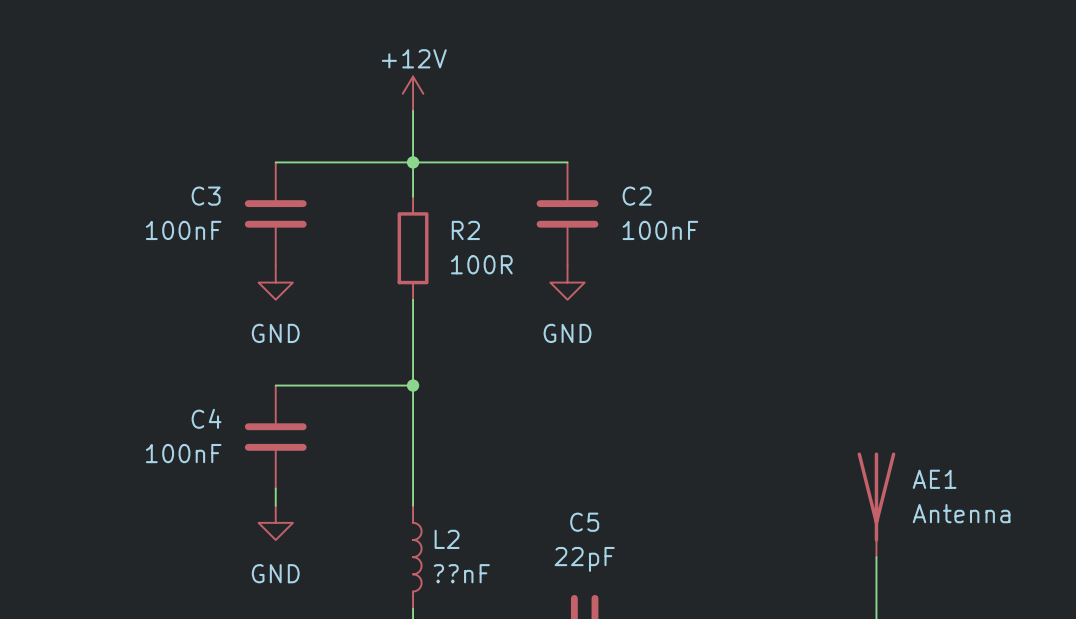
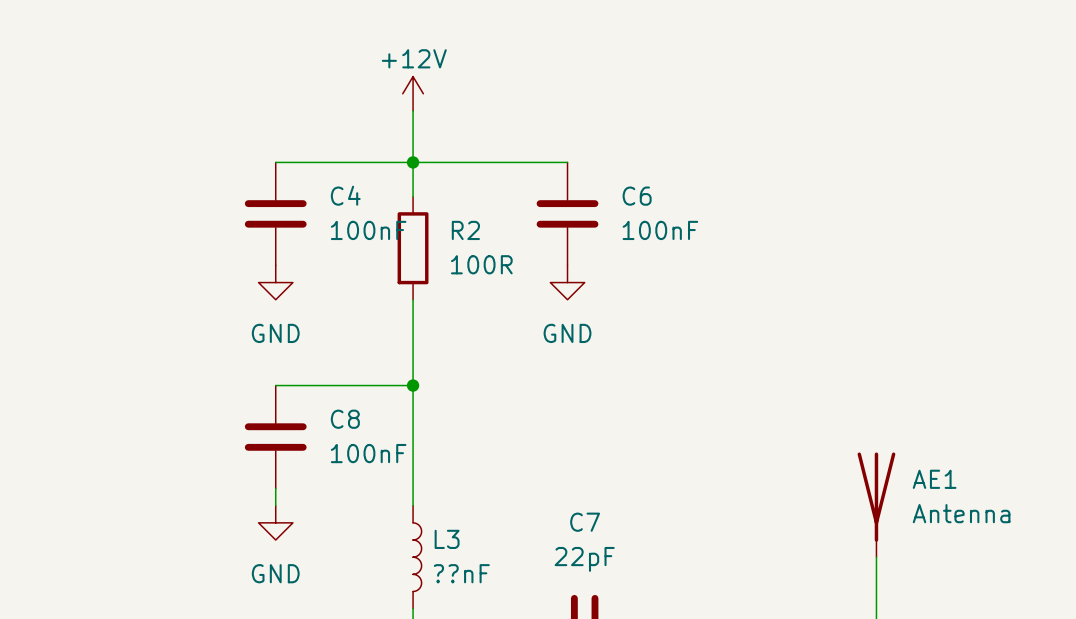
C3 name: C3 (206, 196) -> C4 (345, 195)
C2 name: C2 (637, 196) -> C6 (637, 196)
C3 value position: 100nF (183, 230) -> 100nF (368, 230)
C4 name: C4 (206, 418) -> C8 (345, 419)
C4 value position: 100nF (183, 453) -> 100nF (368, 453)
C5 name: C5 (584, 522) -> C7 (585, 522)
L2 name: L2 (447, 539) -> L3 (447, 539)

